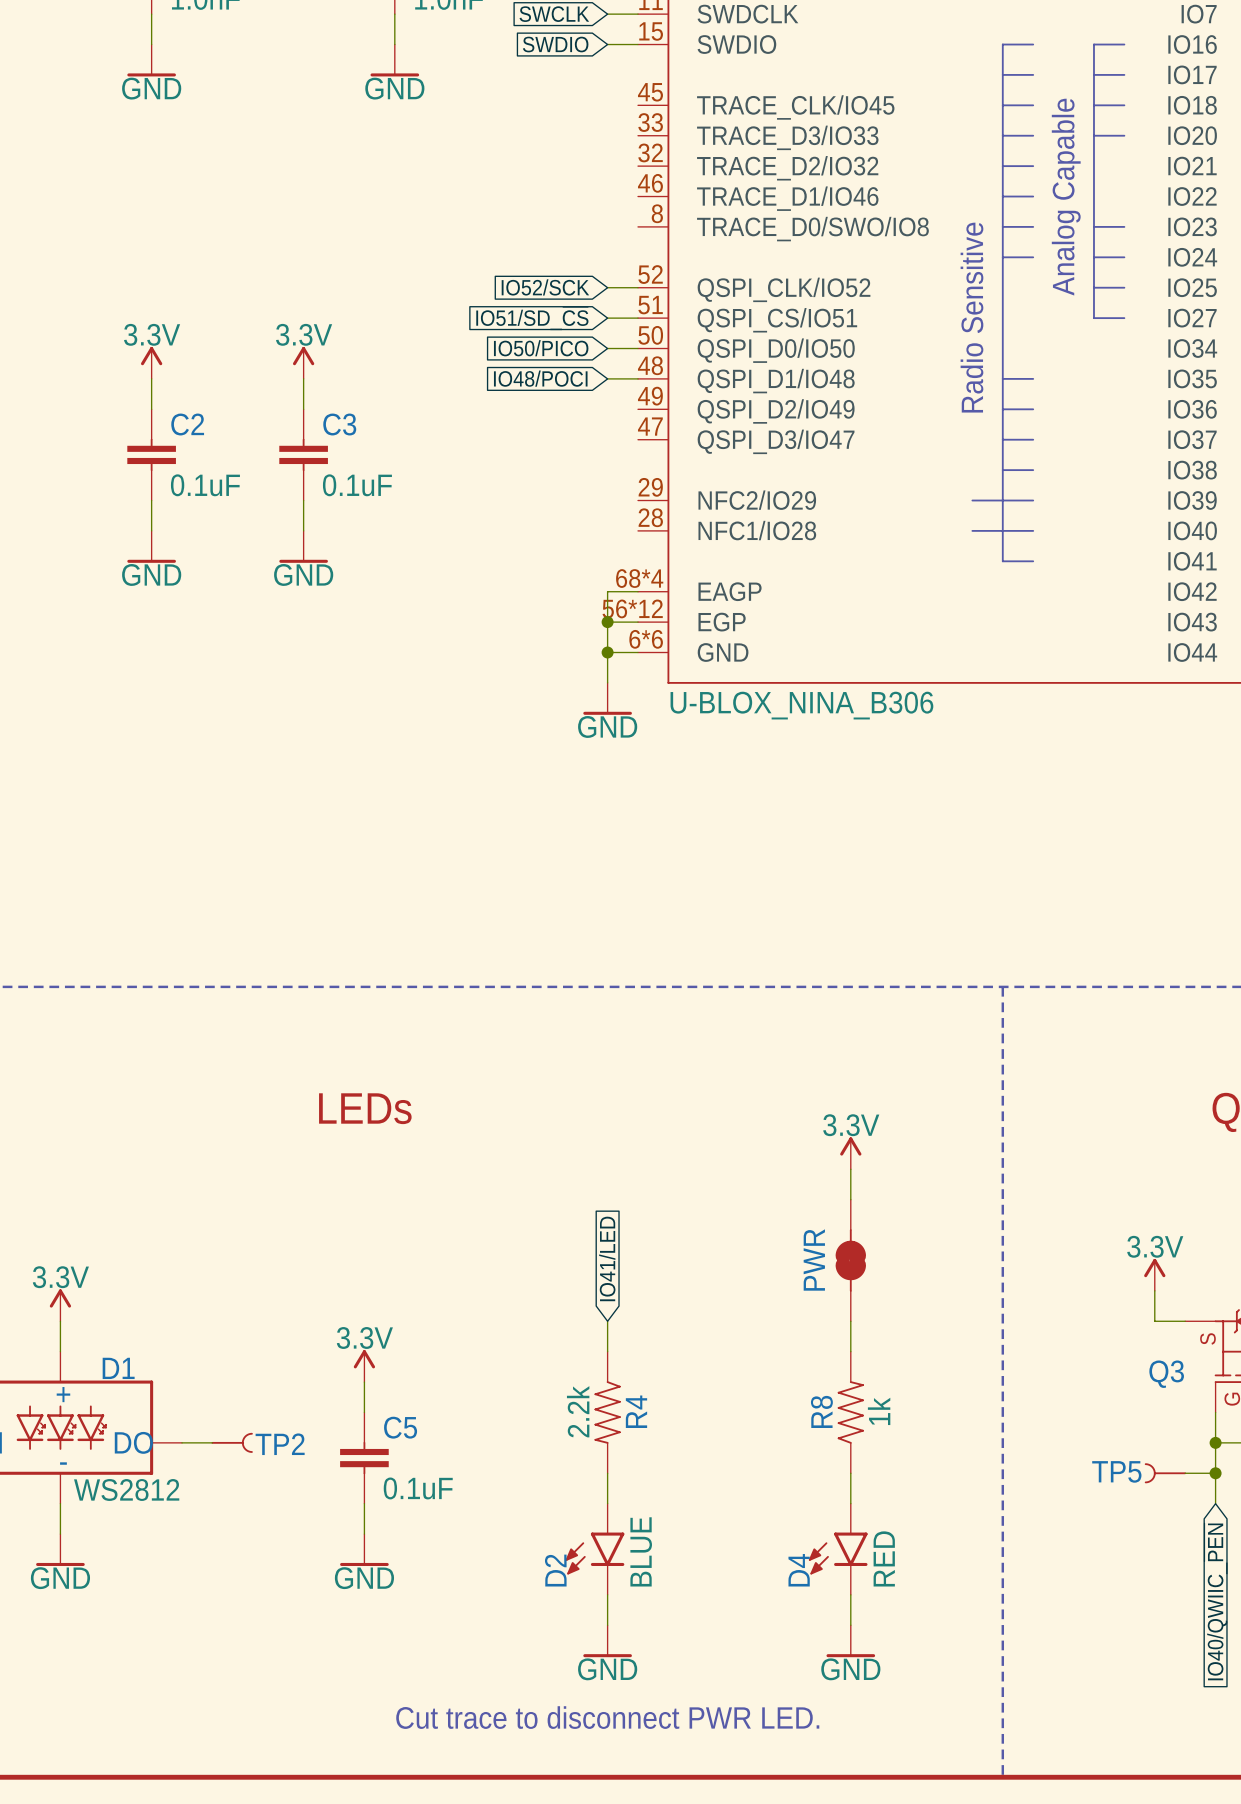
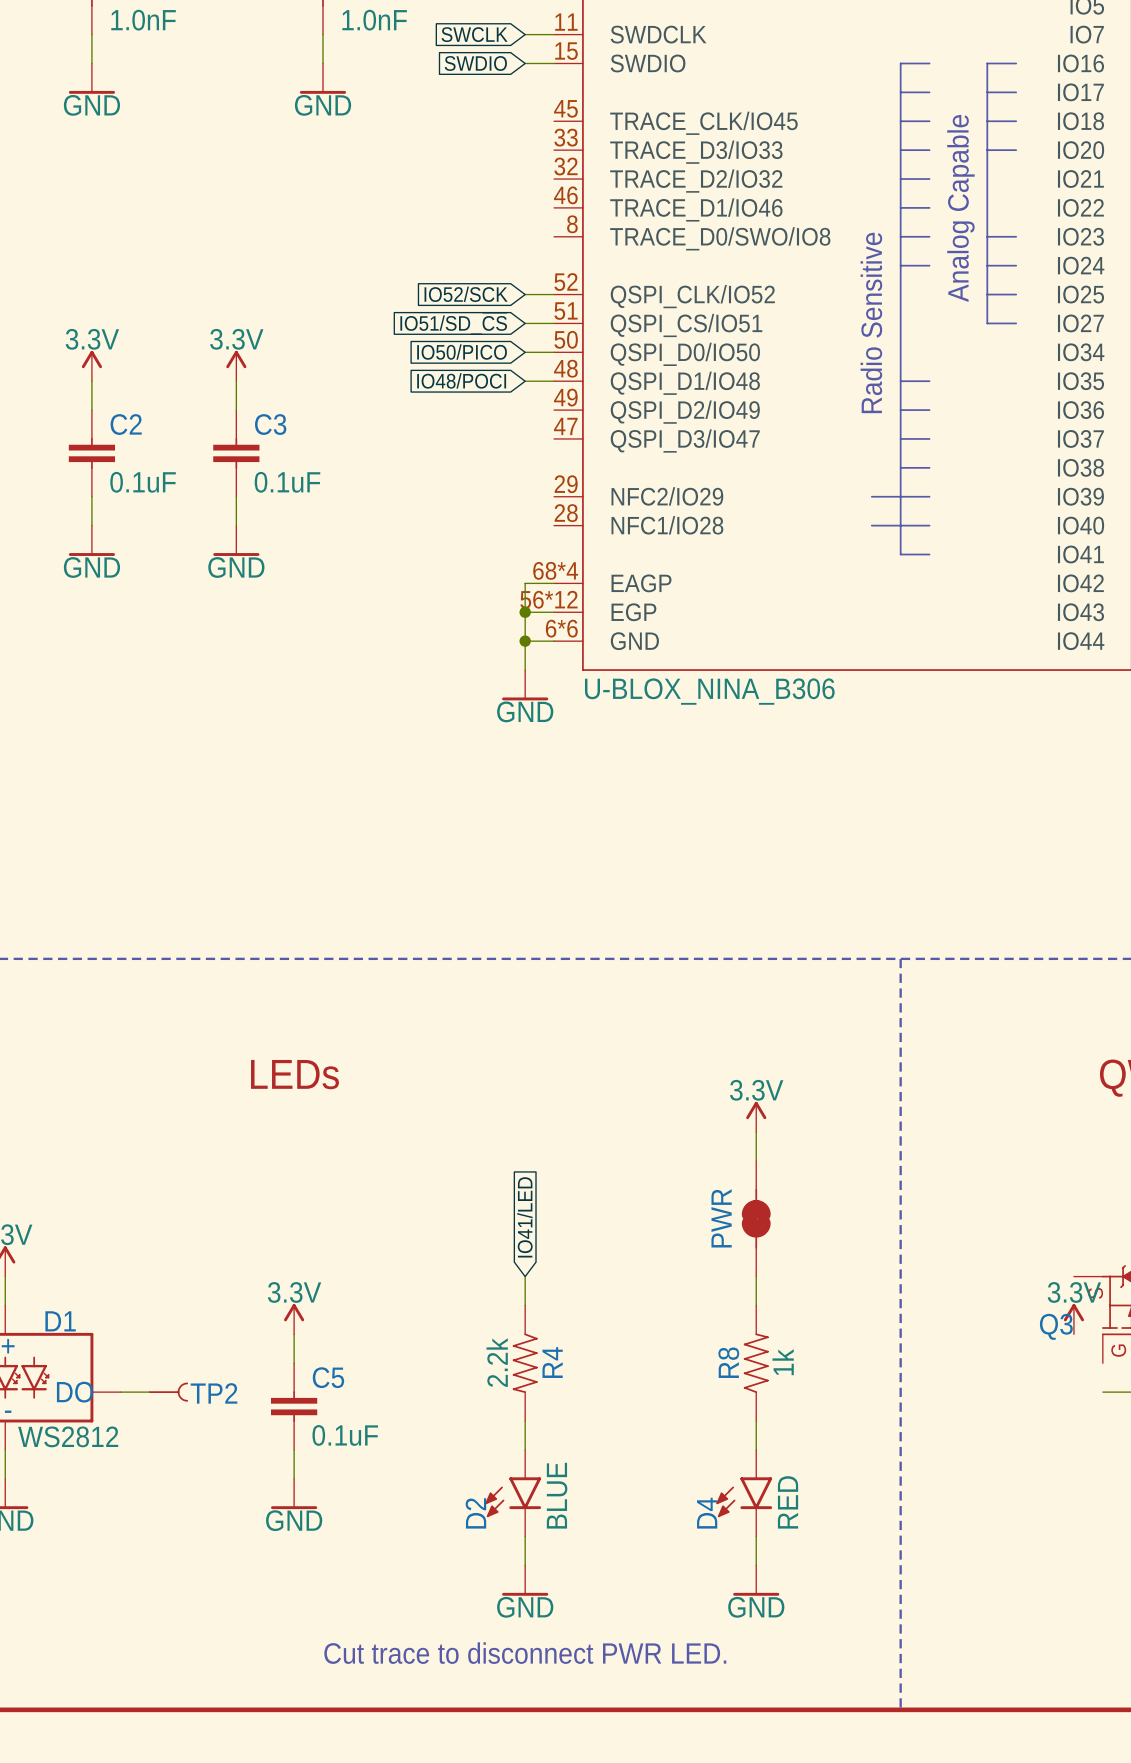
power symbol position: 3.3V (1154, 1274) -> 3.3V (1073, 1319)
wire: (1154, 1290) (1154, 1321) (1185, 1321) -> none
wire: (1215, 1412) (1215, 1503) -> none
junction: (1215, 1442) -> none
TP5: (1165, 1473) -> none
wire: (1185, 1473) (1215, 1473) -> none
junction: (1215, 1473) -> none
global label: IO40/QWIIC_~{PEN} (1216, 1601) -> none

